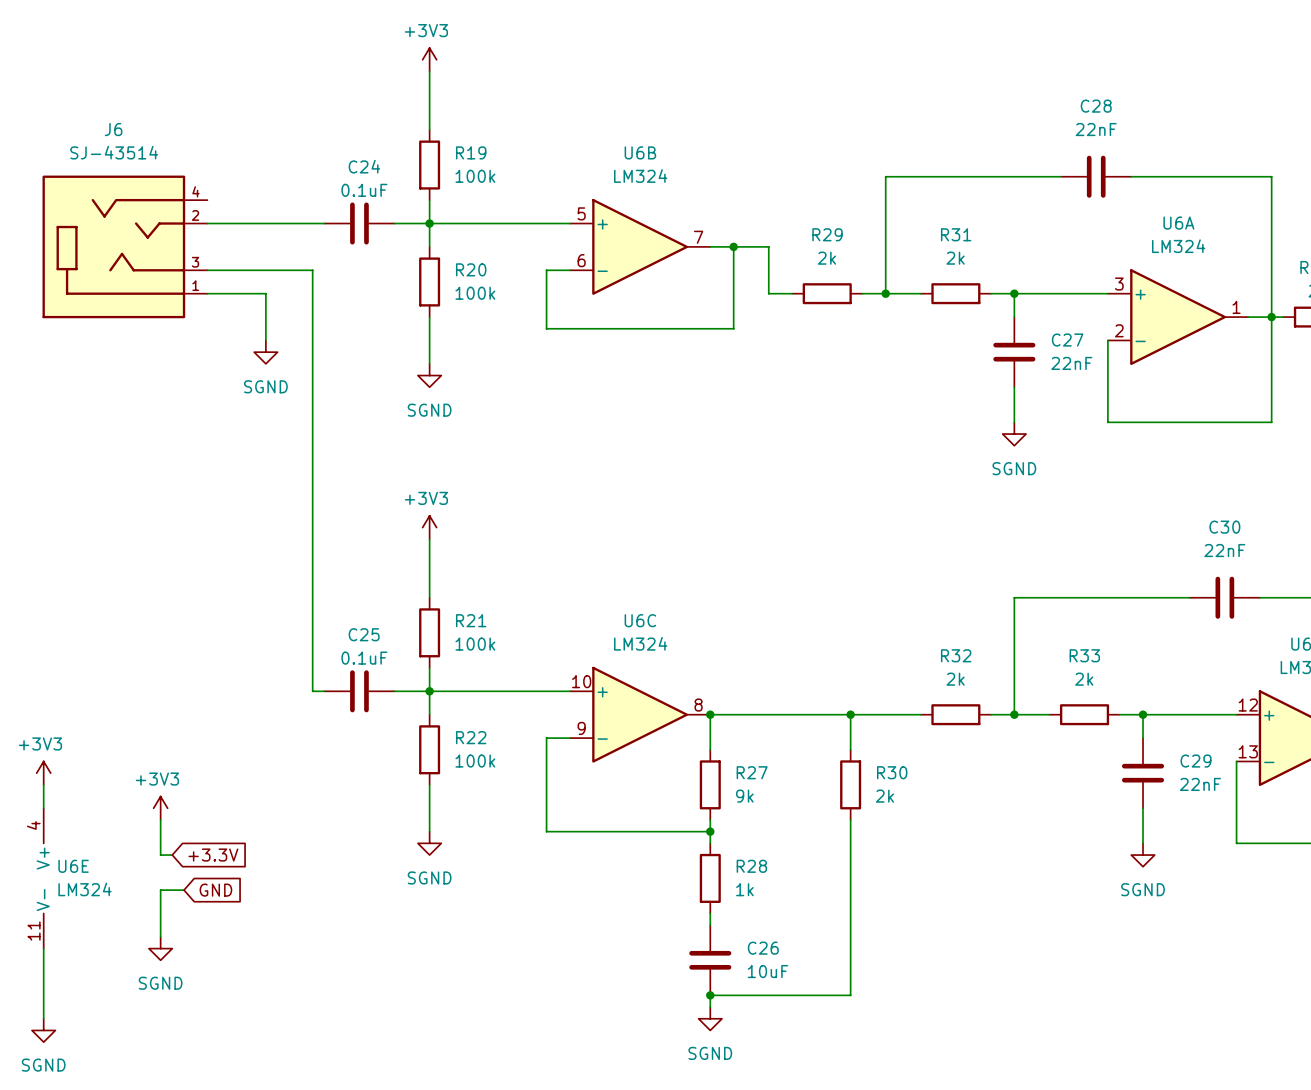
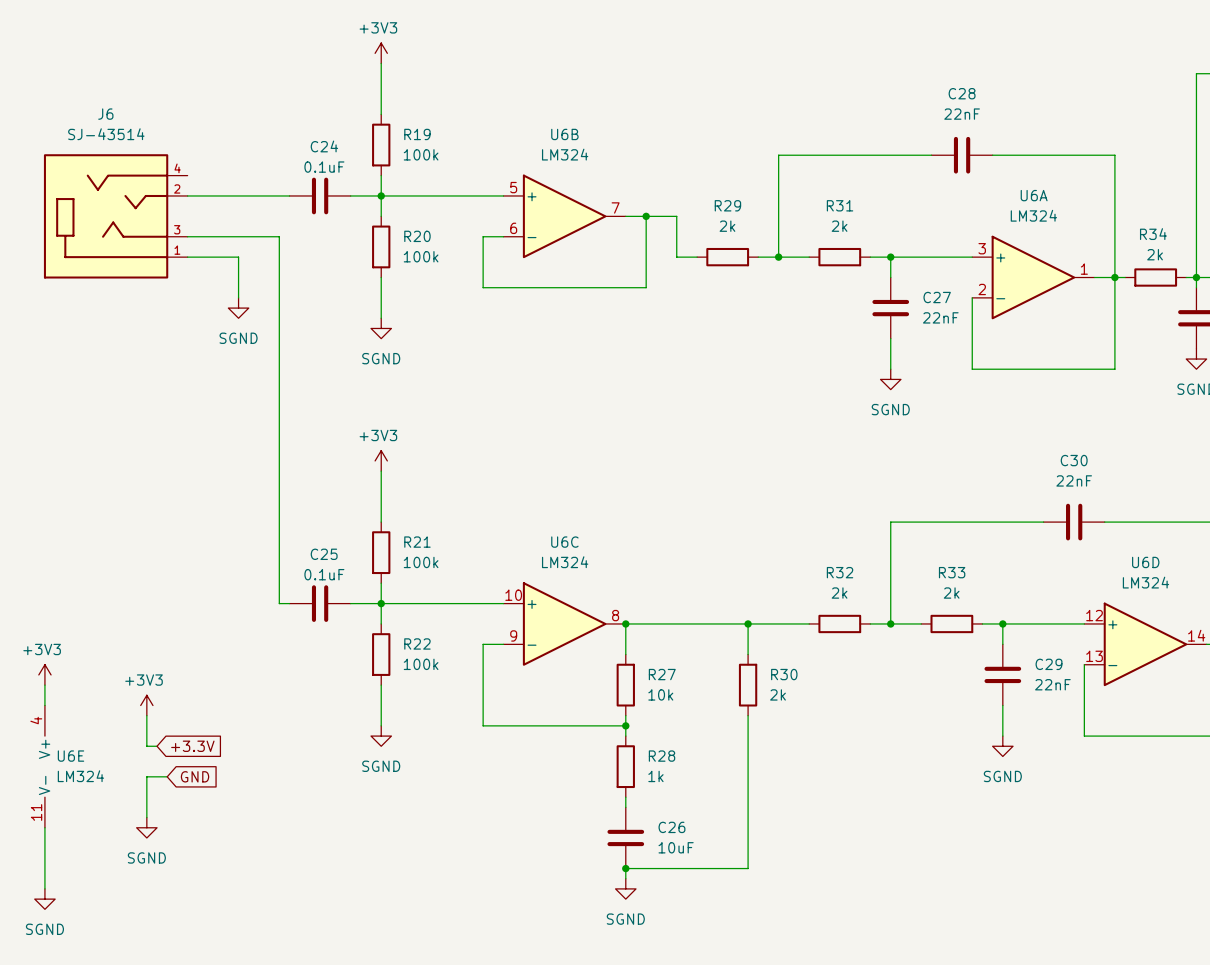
R27 value: 9k (744, 796) -> 10k (660, 694)

